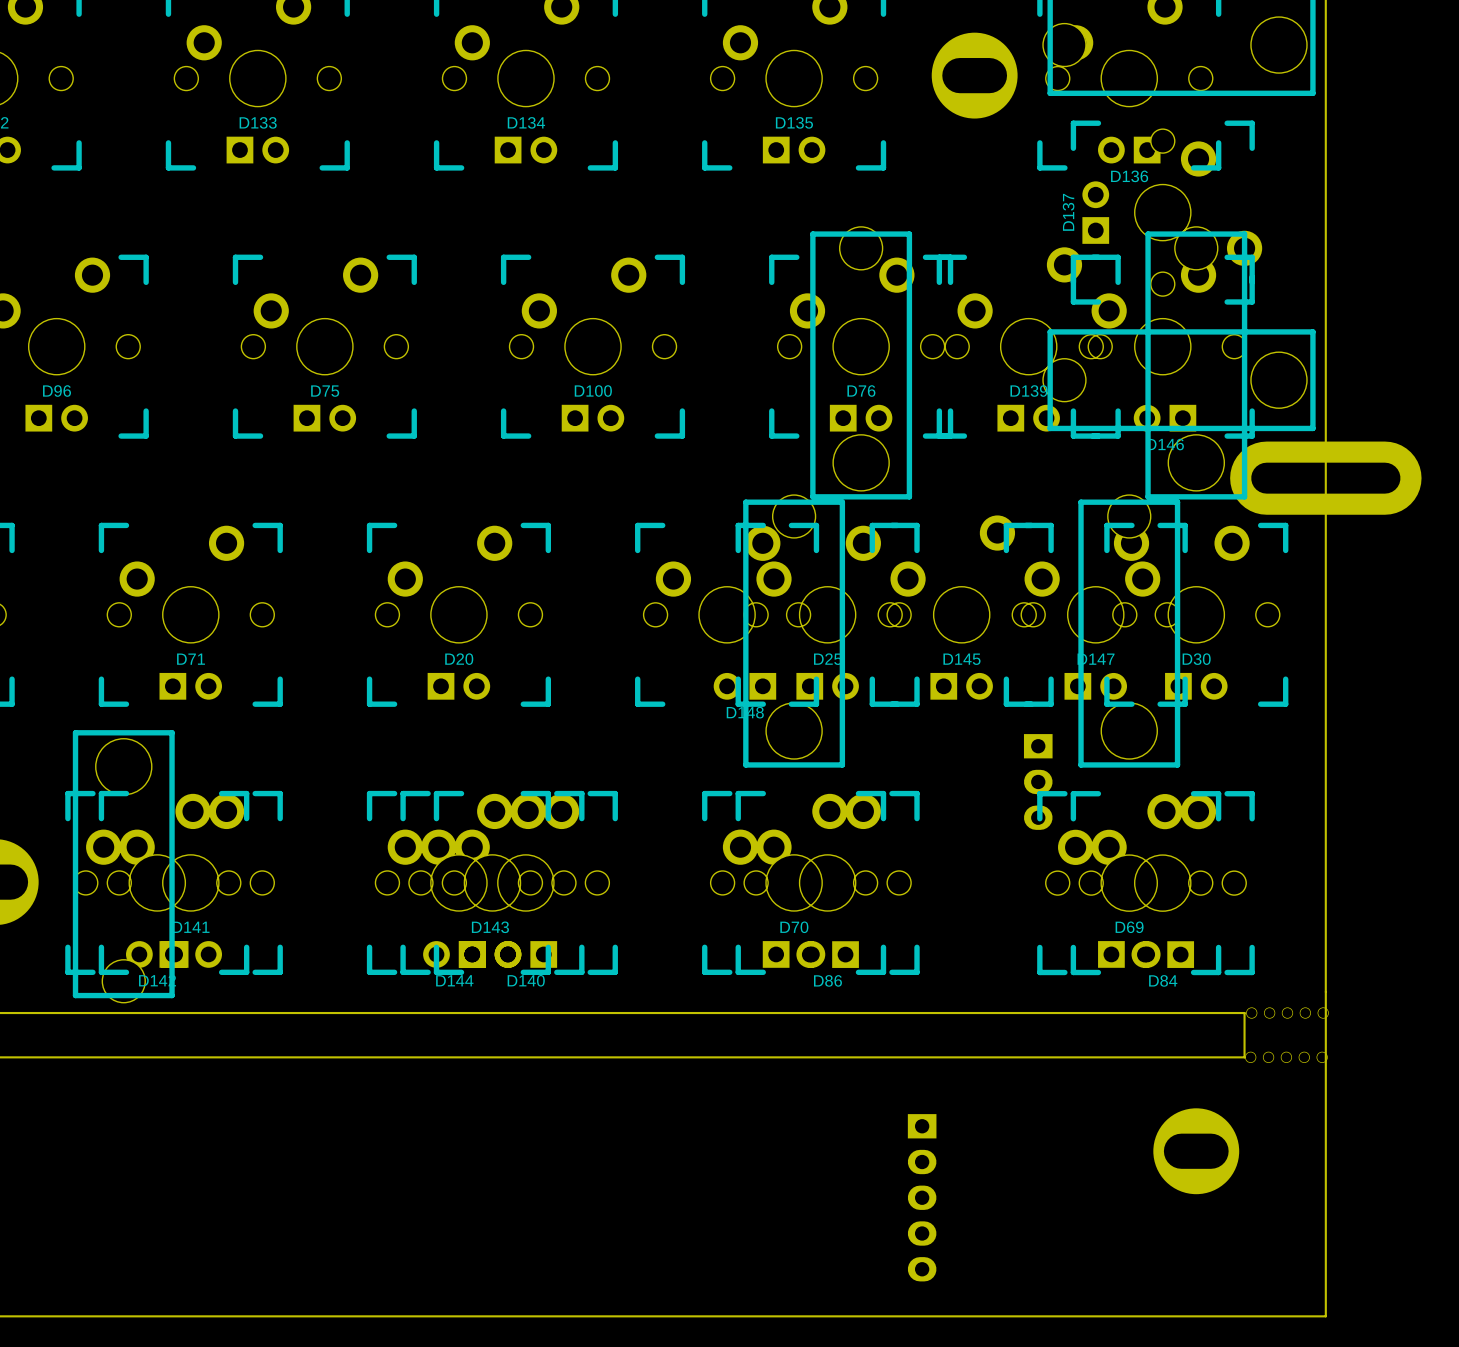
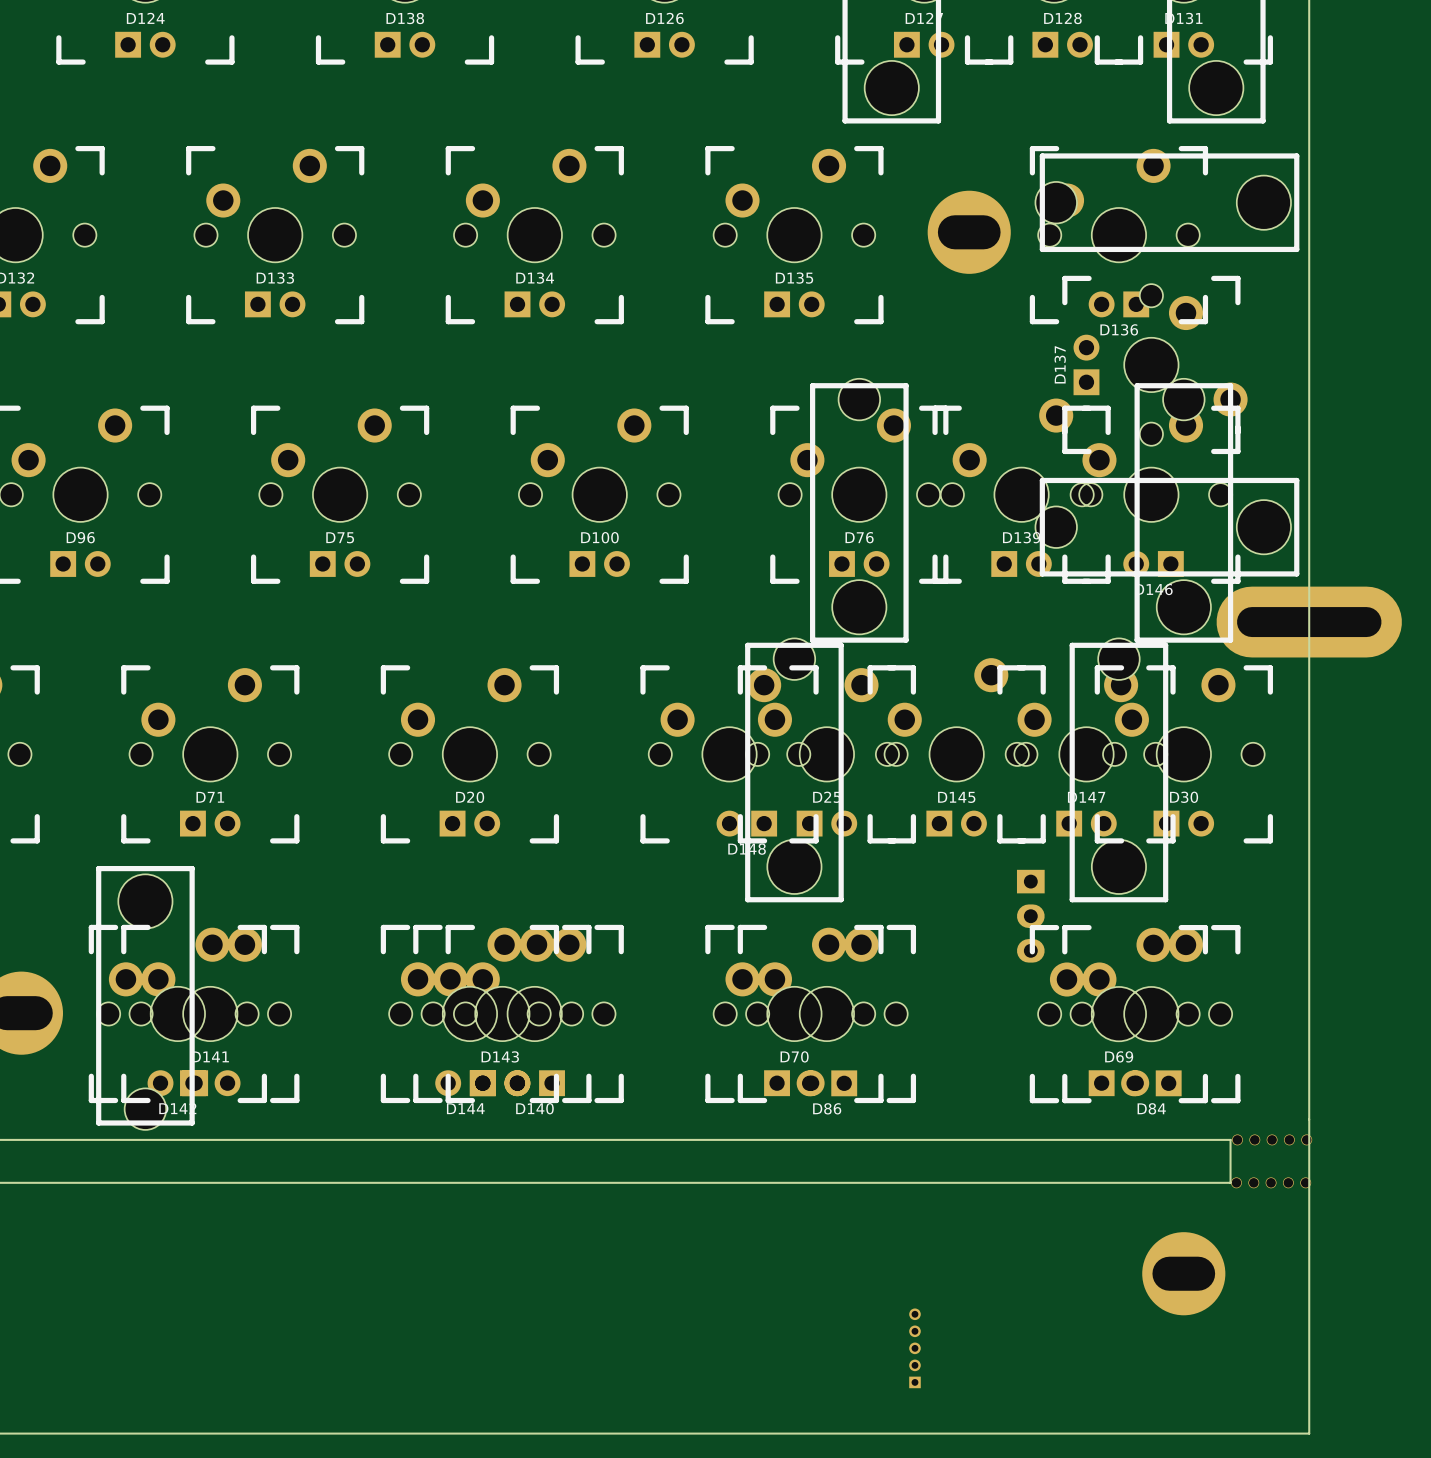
part: (922, 1197) -> none
part: none -> (914, 1348)

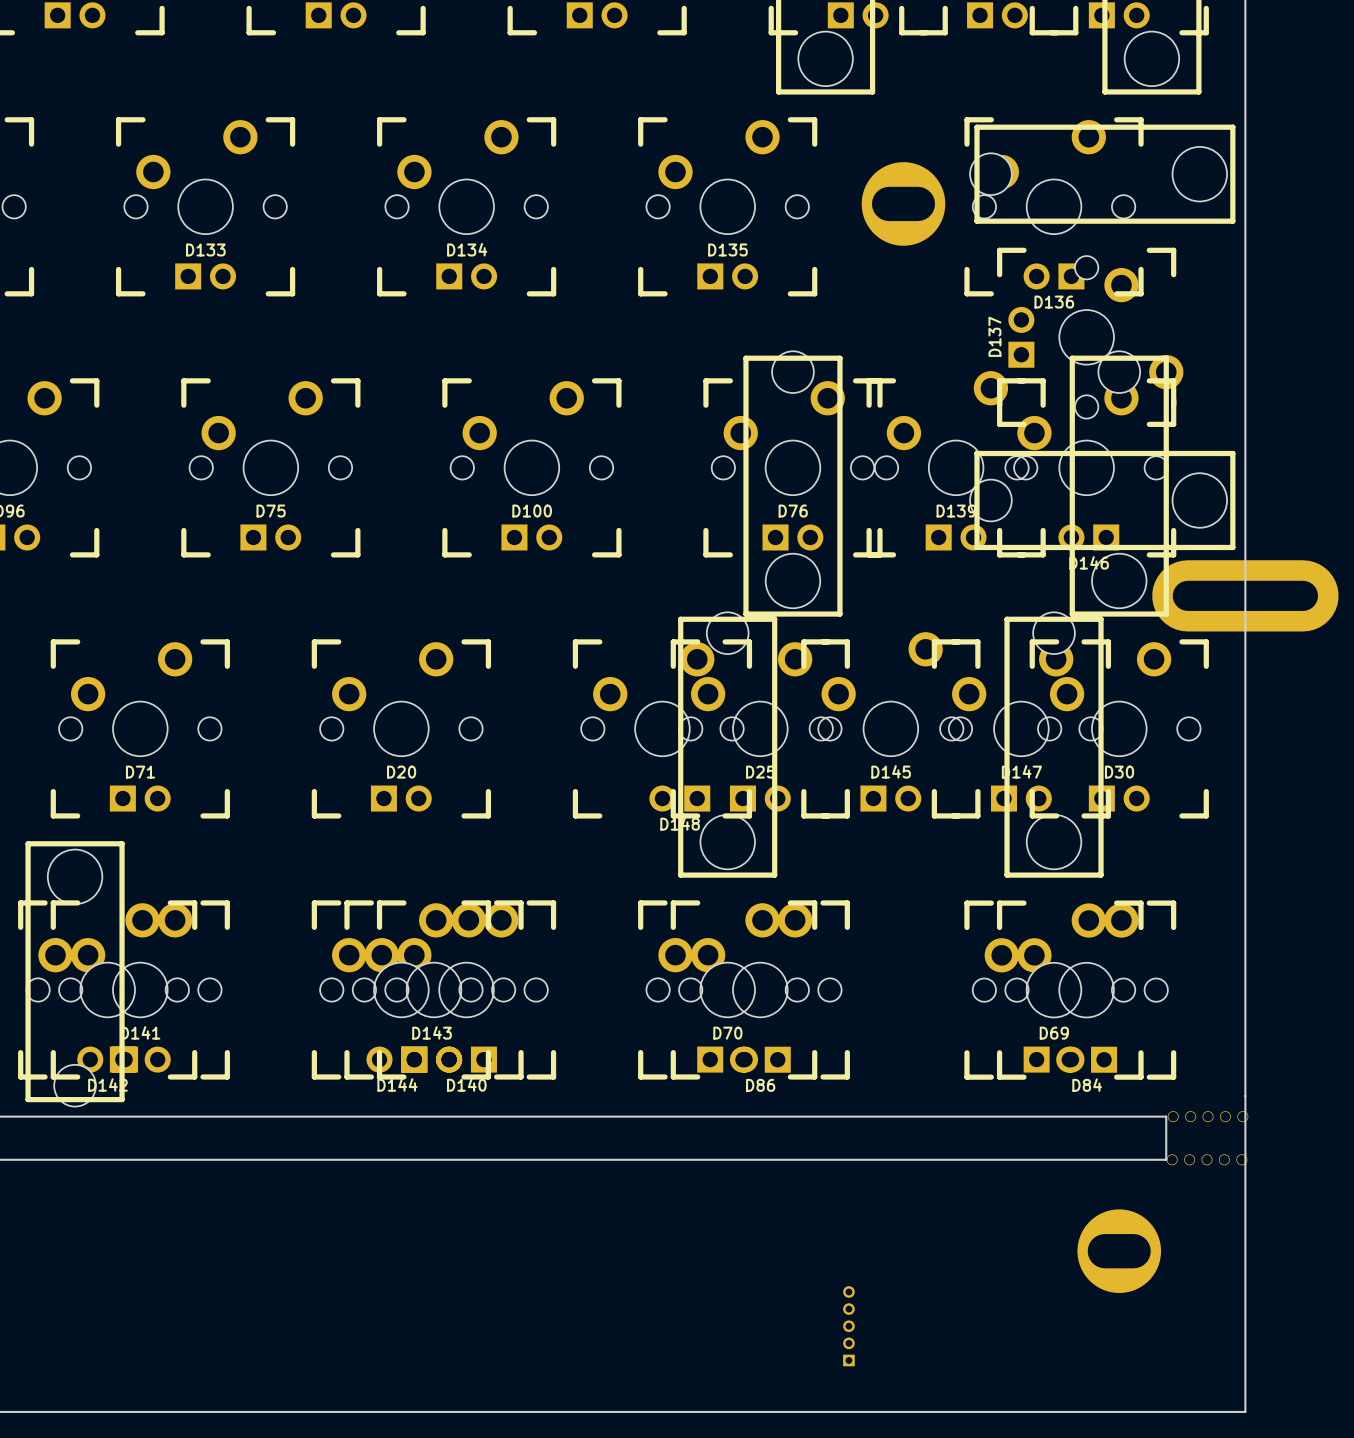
part: (1030, 916) -> none

